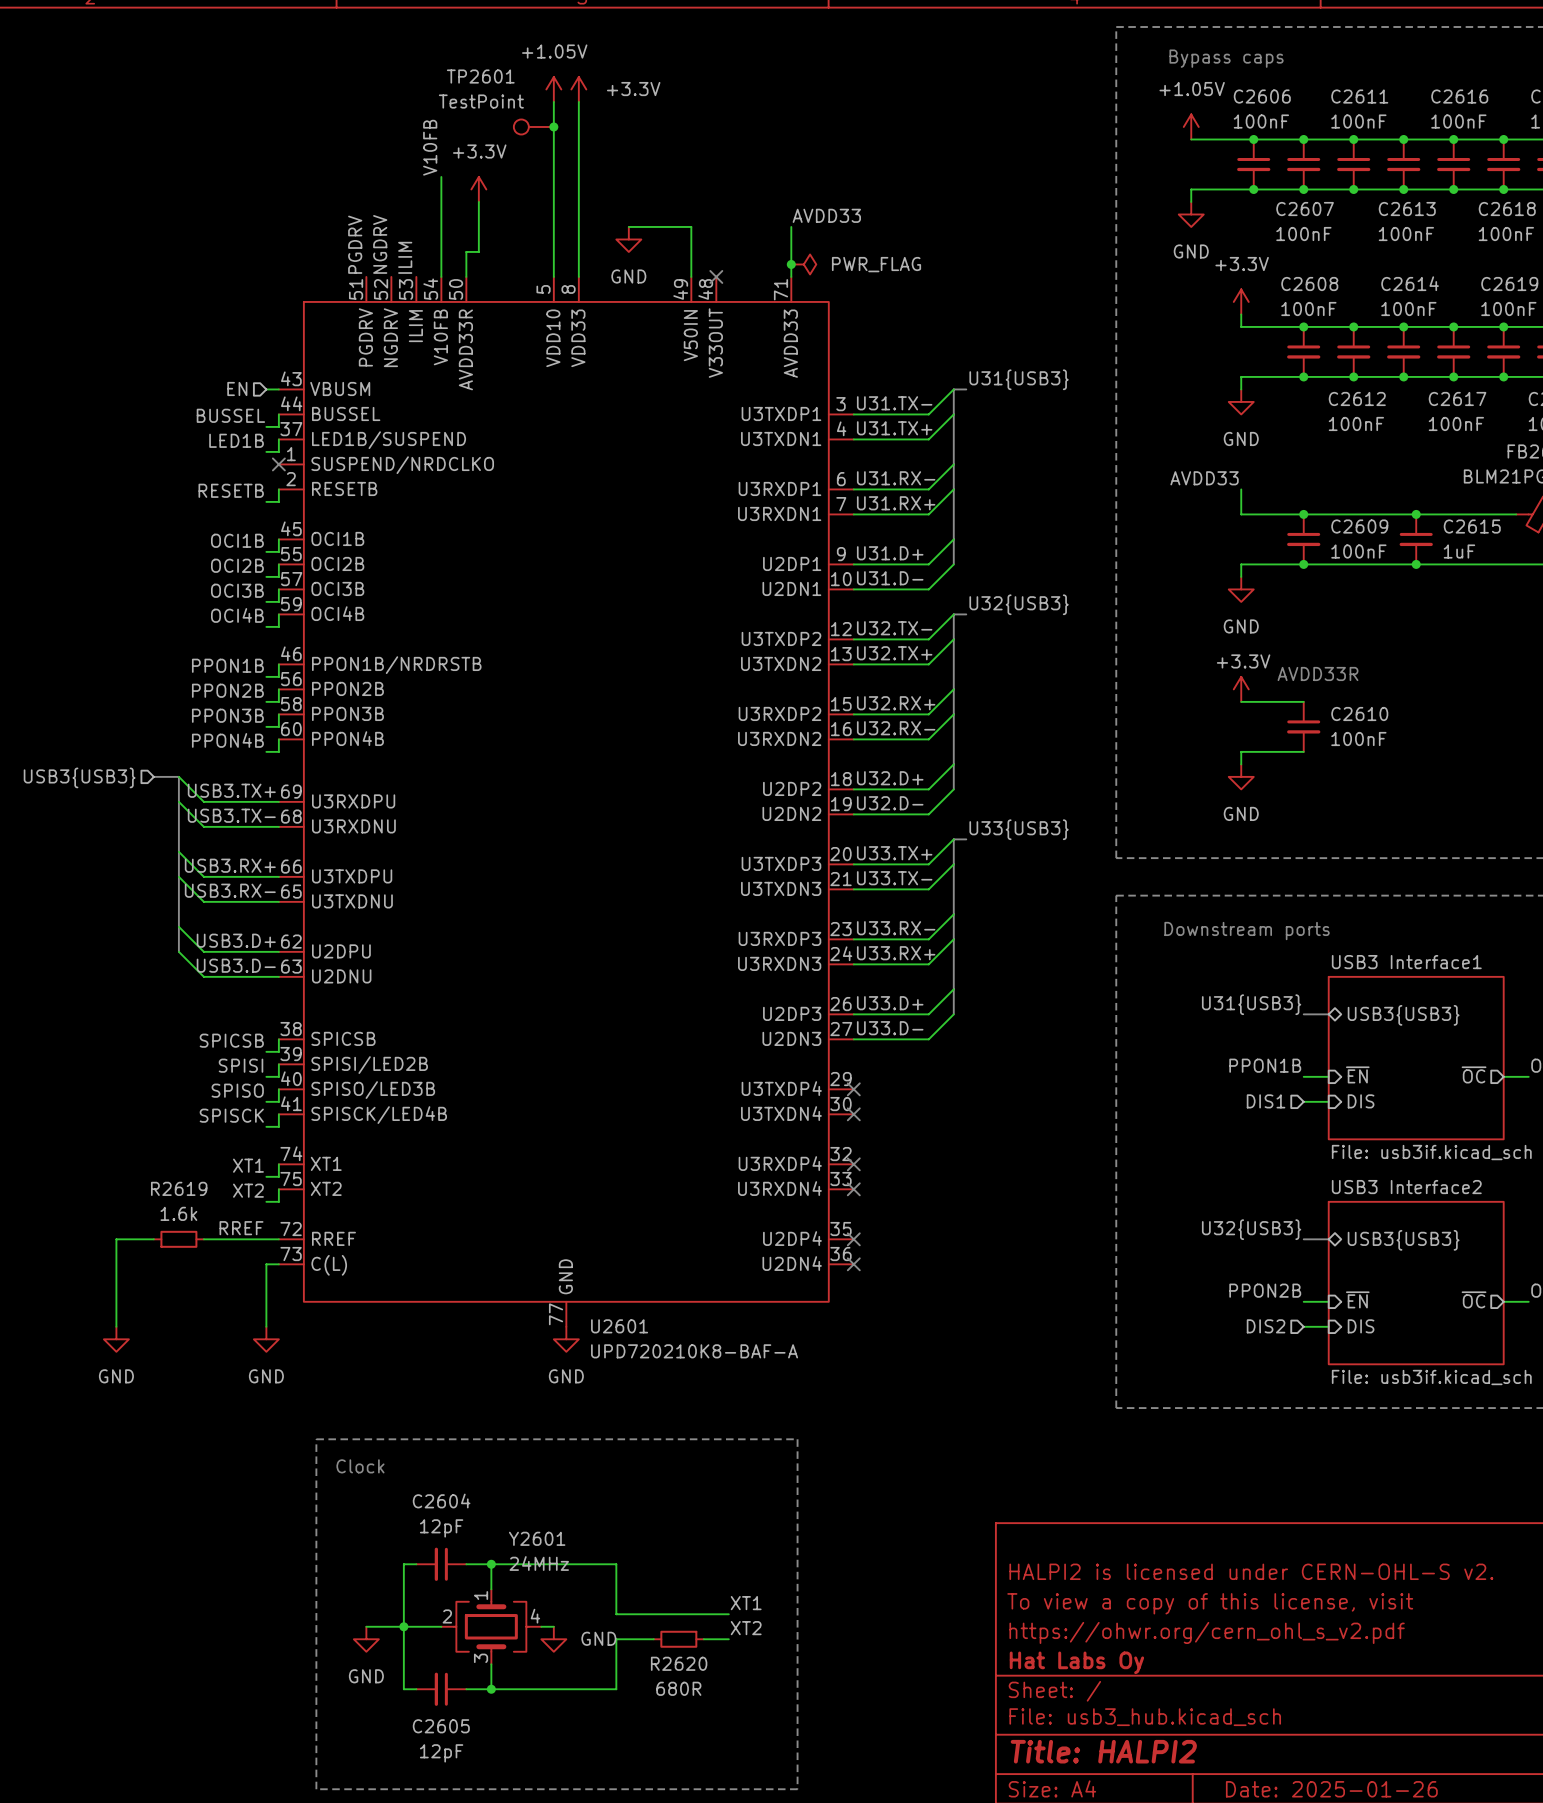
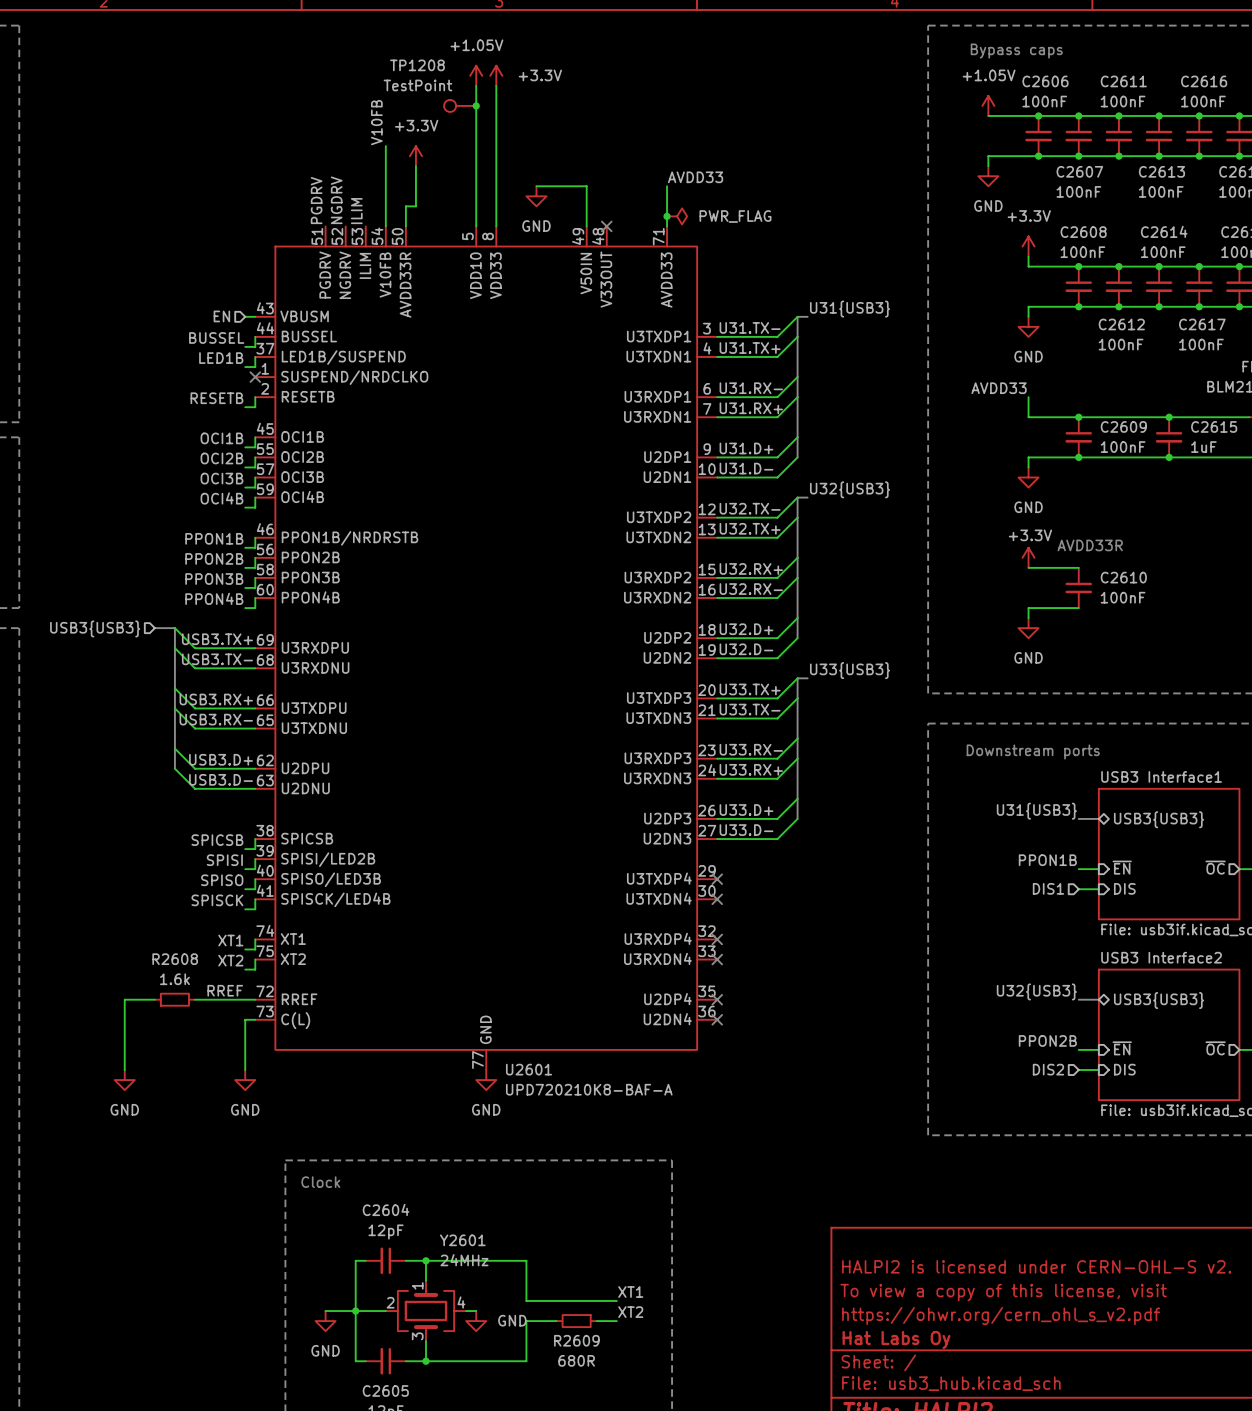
TP2601 name: TP2601 (480, 76) -> TP1208 (417, 65)
R2619 name: R2619 (179, 1188) -> R2608 (175, 959)
R2620 name: R2620 (679, 1663) -> R2609 (576, 1340)

